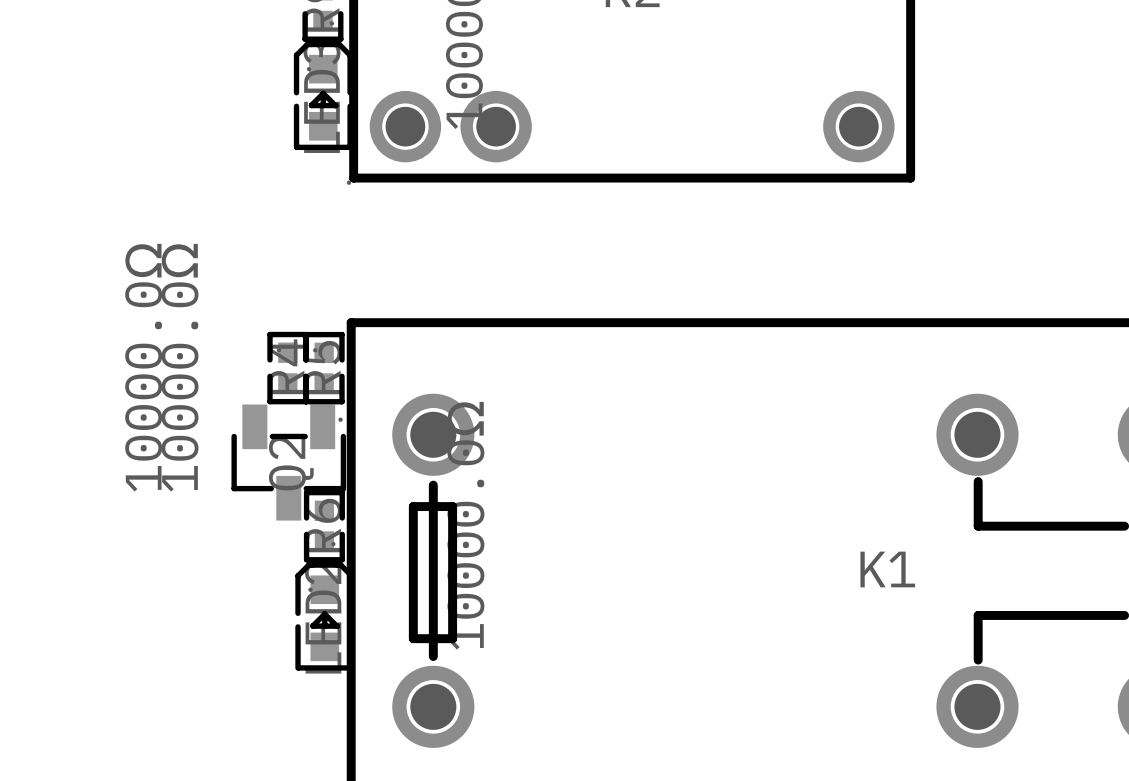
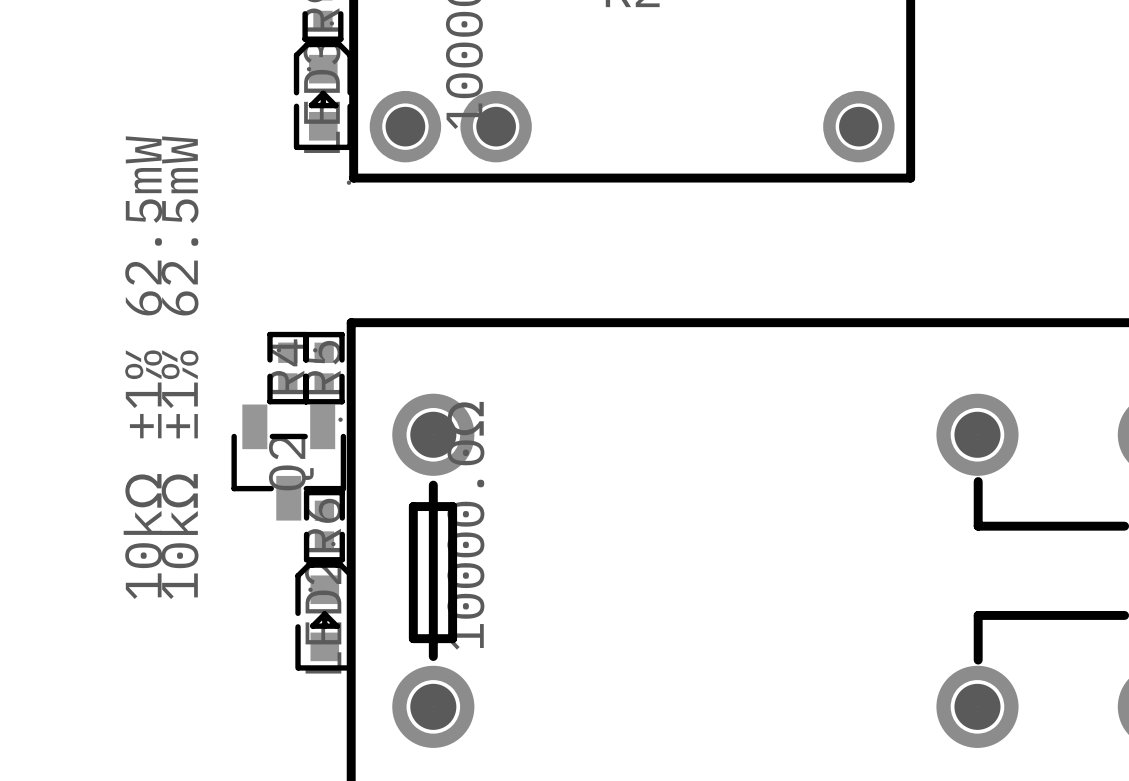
part value: 10000.0Ω (143, 367) -> 10kΩ ±1% 62.5mW (142, 367)
part value: 10000.0Ω (180, 367) -> 10kΩ ±1% 62.5mW (179, 367)
K1 name: K1 (887, 569) -> none

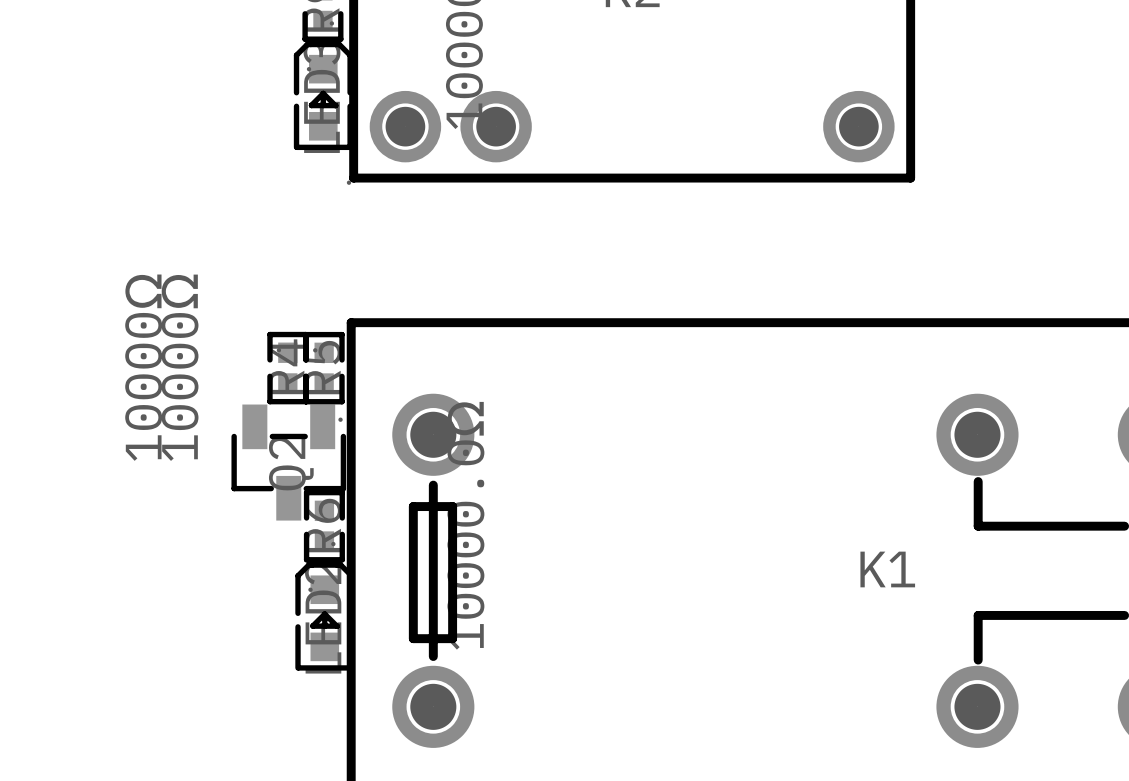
part value: 10kΩ ±1% 62.5mW (142, 367) -> 10000Ω (143, 367)
part value: 10kΩ ±1% 62.5mW (179, 367) -> 10000Ω (180, 367)
K1 name: none -> K1 (887, 569)

